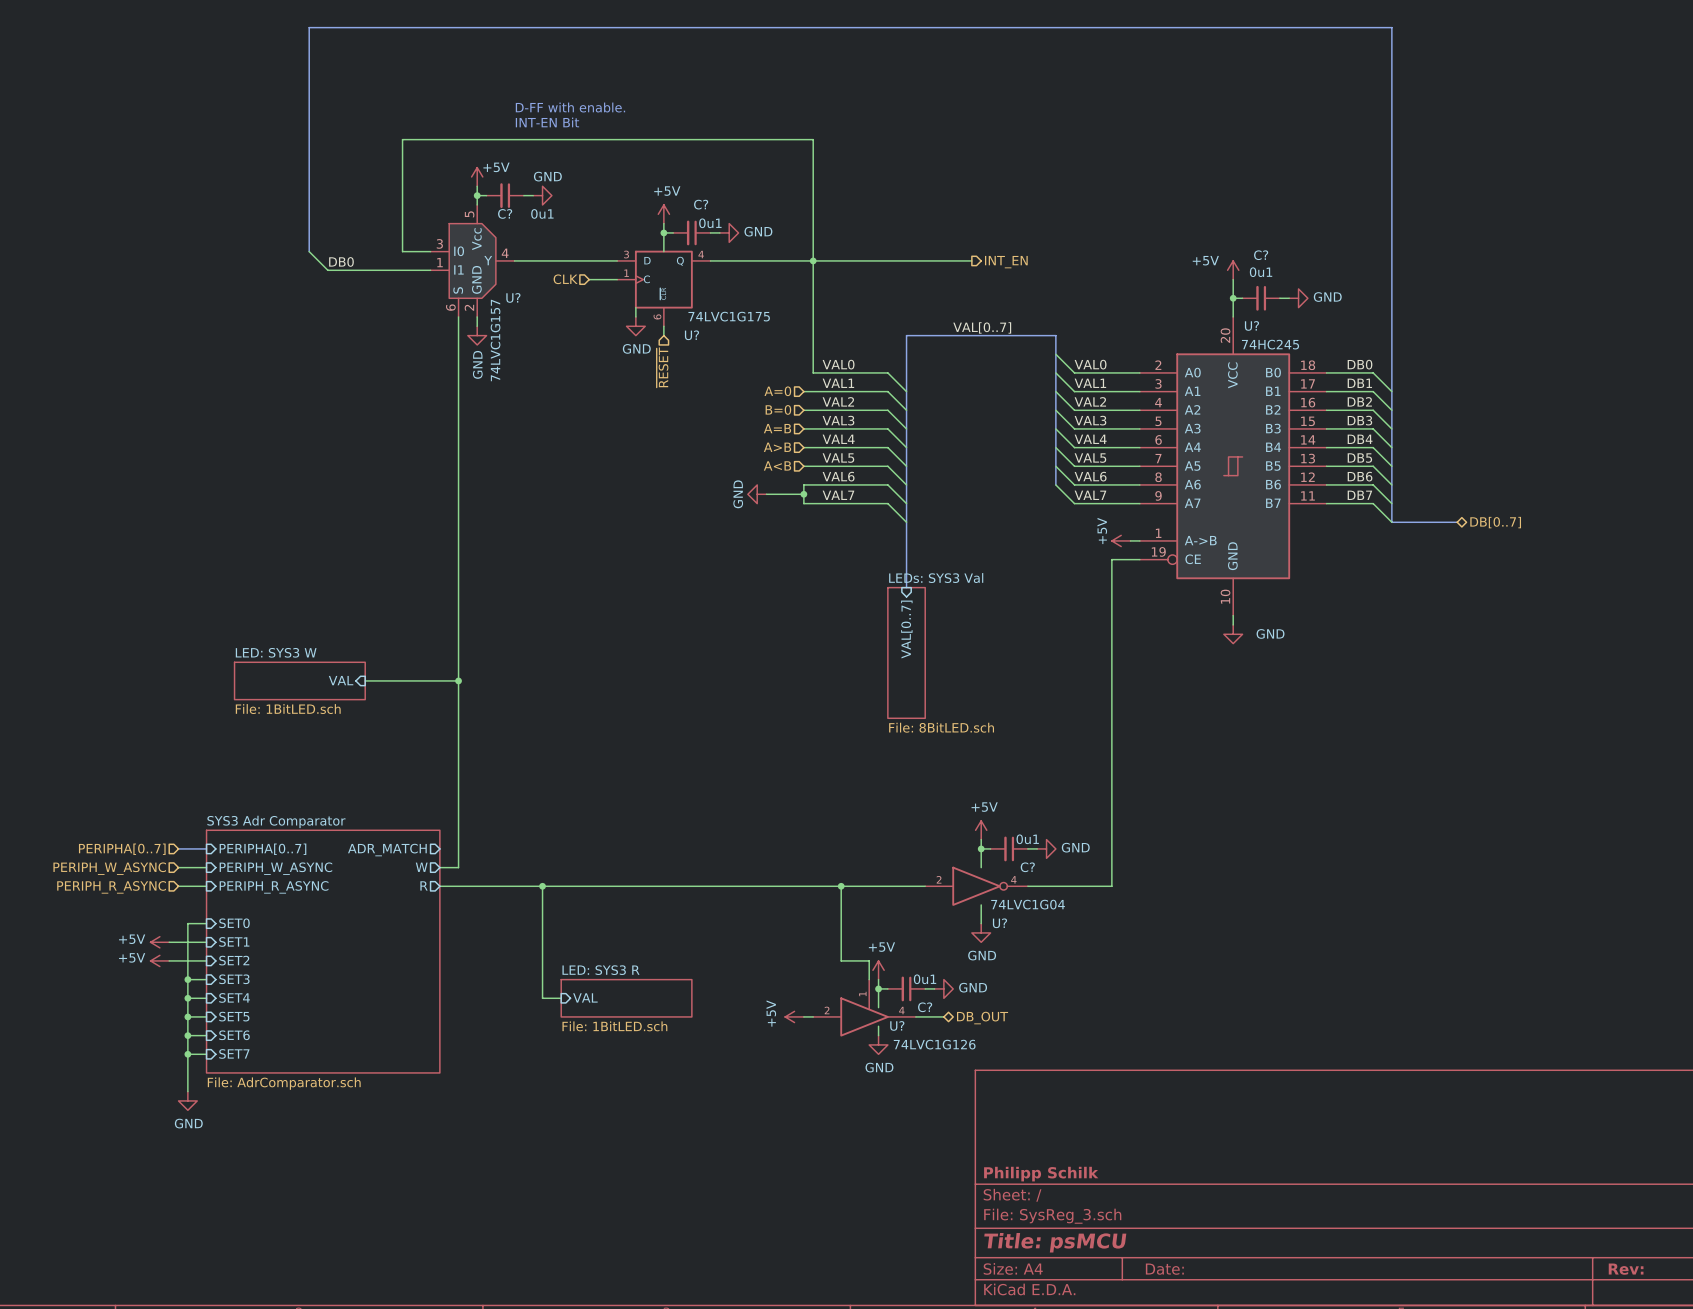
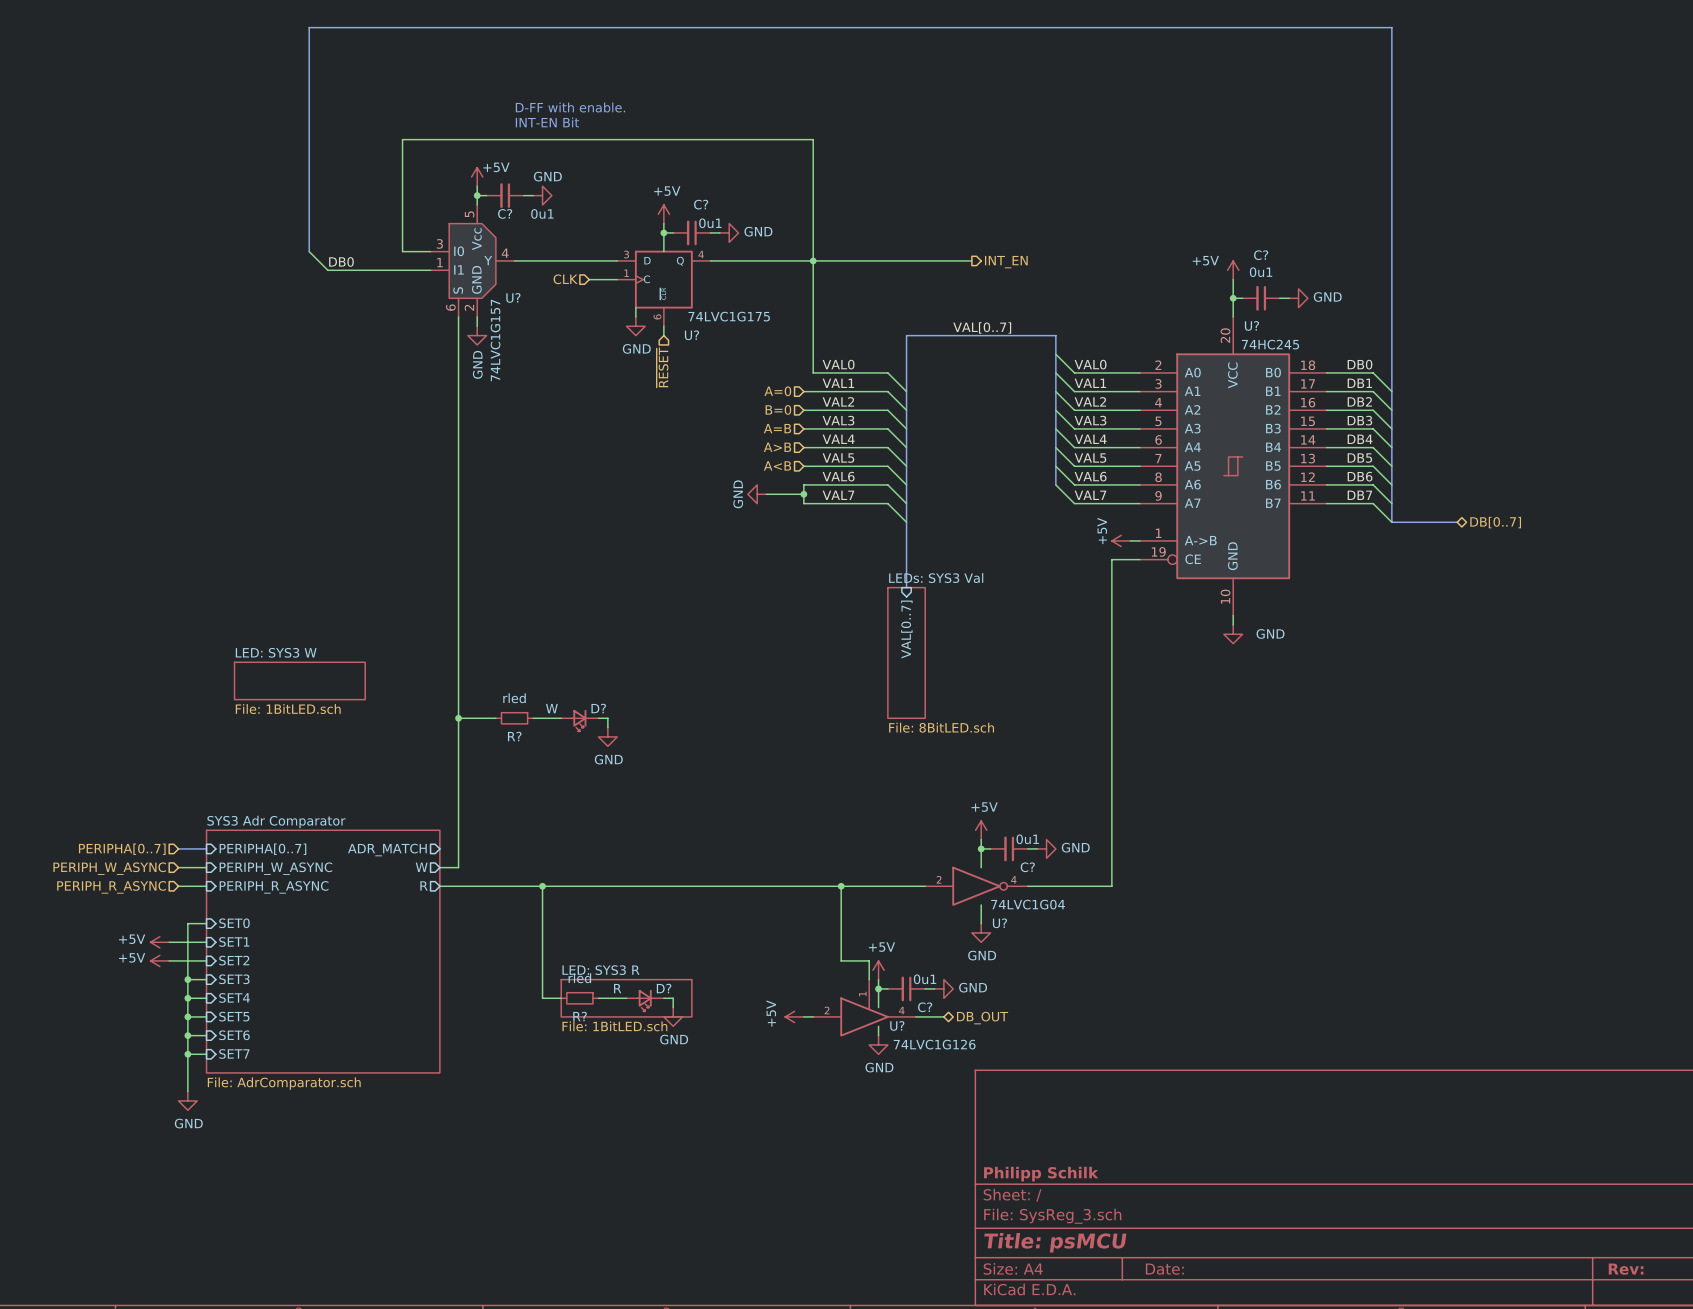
sheet pin: VAL (341, 680) -> none
wire: (365, 680) (458, 680) -> none
junction position: (458, 680) -> (458, 718)
wire: none -> (458, 718) (495, 718)
R?: none -> rled (514, 718)
wire: none -> (533, 718) (561, 718)
wire: none -> (598, 718) (607, 718) (607, 727)
D?: none -> W (579, 720)
power symbol: none -> GND (607, 736)
sheet pin: VAL (585, 997) -> none
R?: none -> rled (579, 998)
wire: none -> (598, 998) (626, 998)
wire: none -> (663, 998) (673, 998) (673, 1007)
D?: none -> R (645, 1000)
power symbol: none -> GND (673, 1016)

